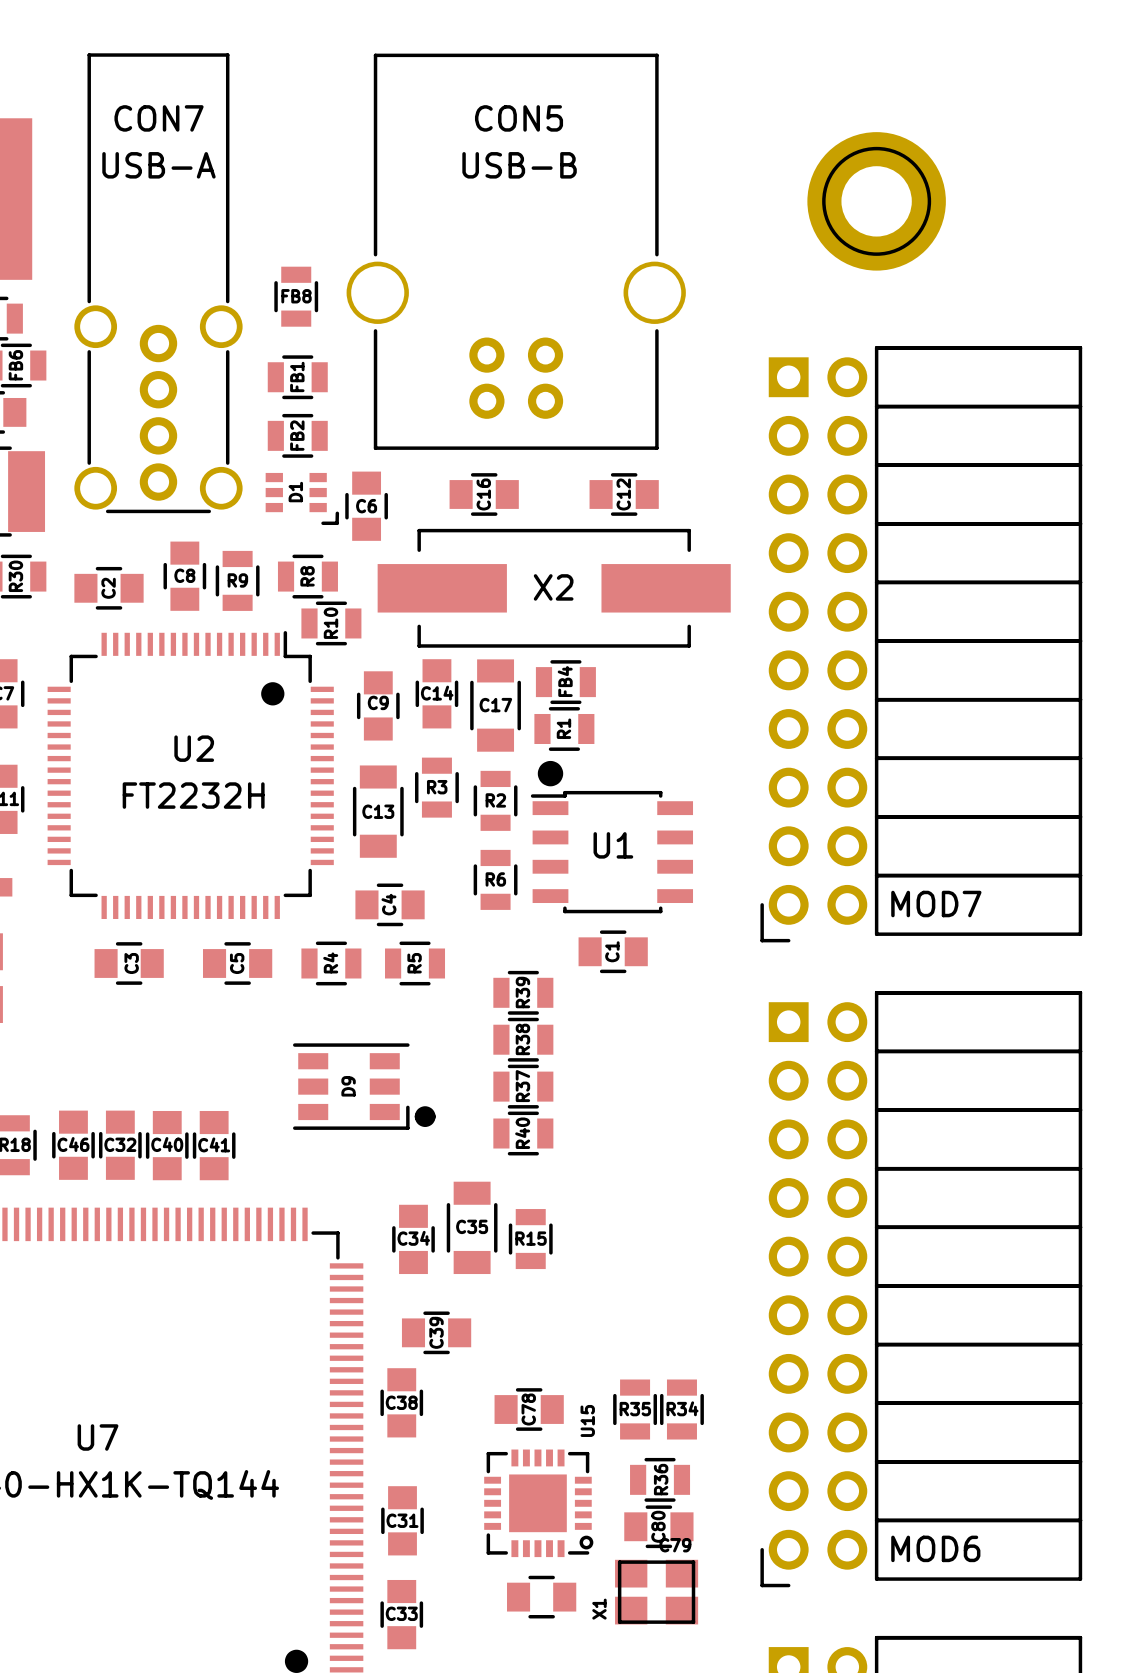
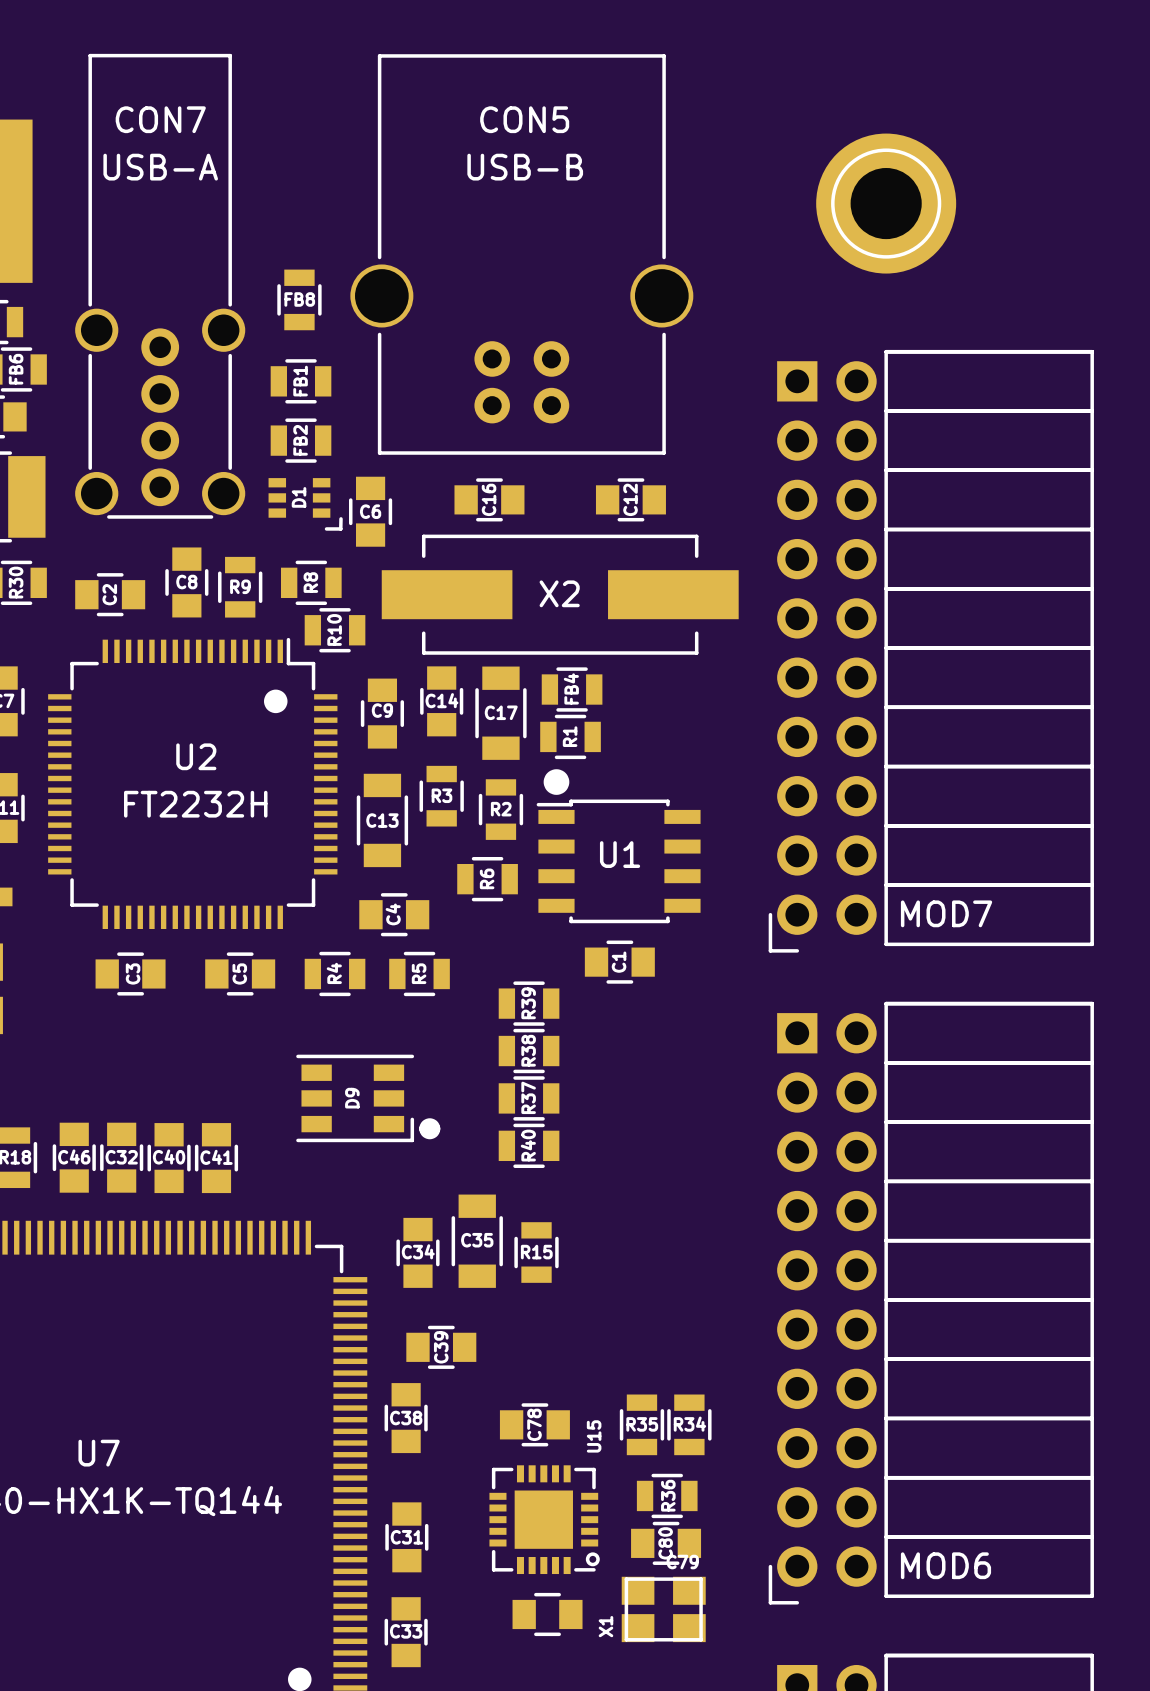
R6 rotation: 0° (495, 879) -> 90° clockwise (487, 879)

